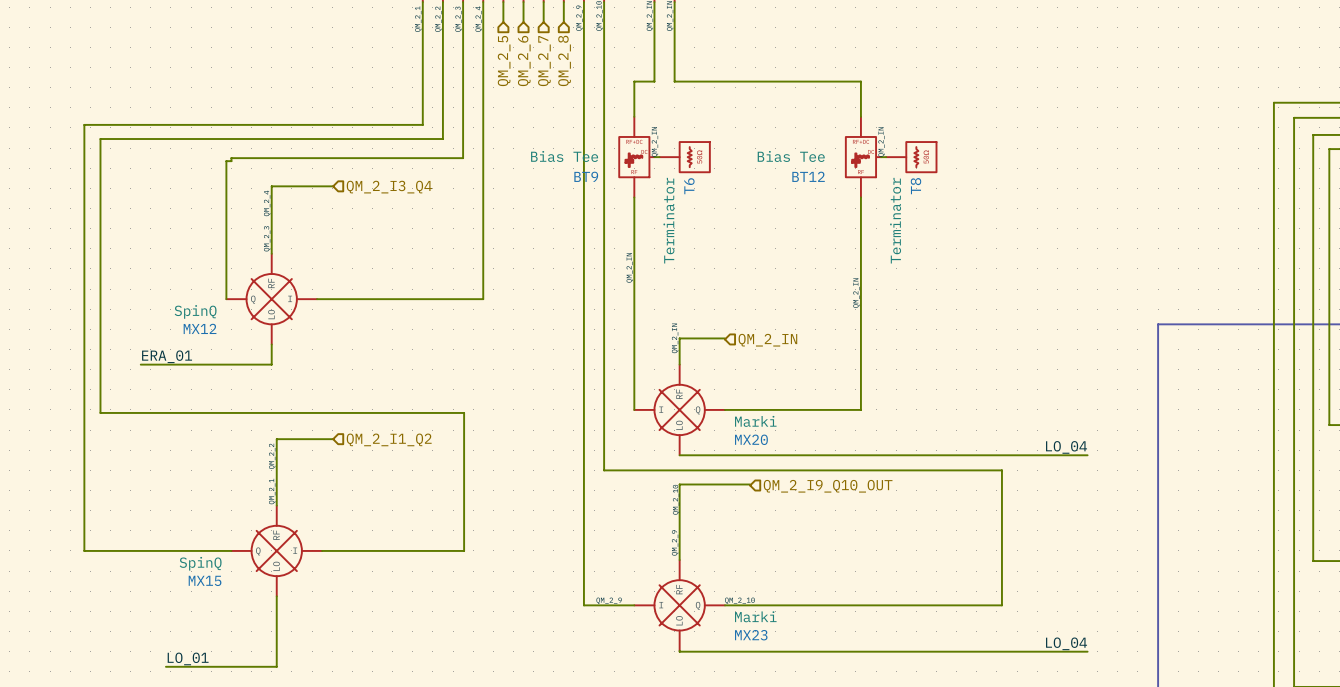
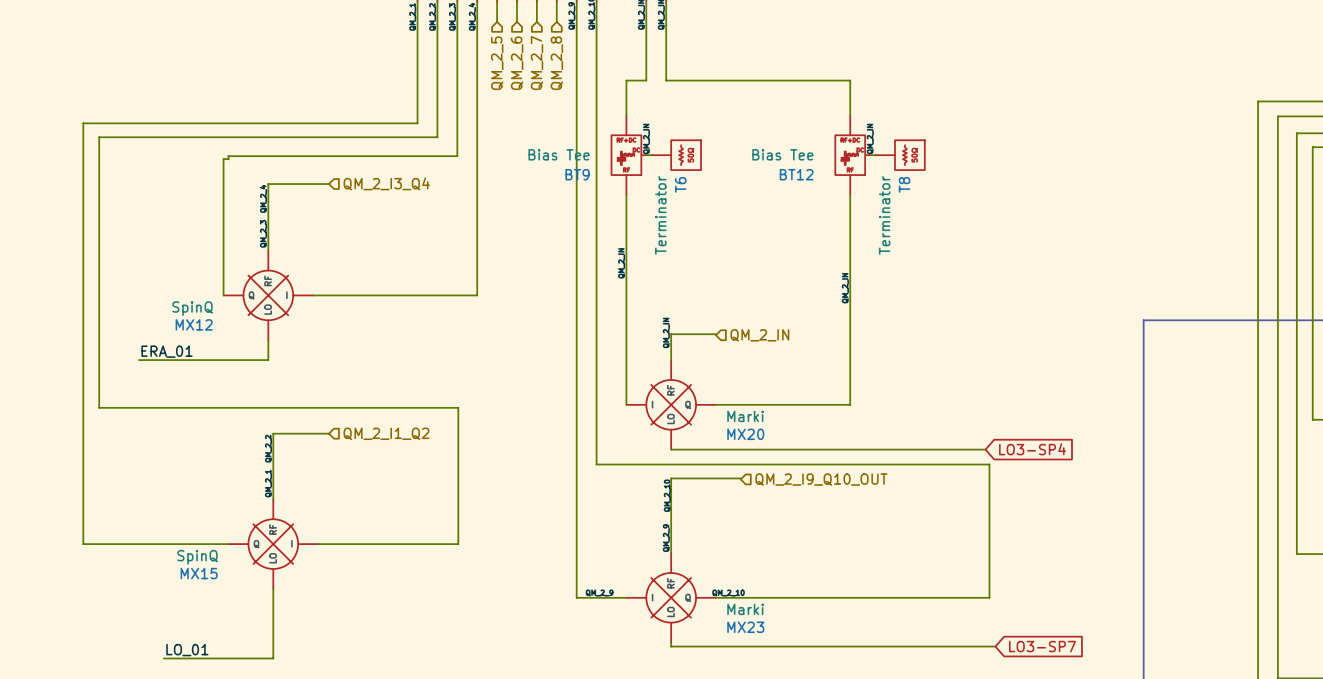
label: LO_04 (1066, 447) -> none
wire: (997, 455) (1087, 455) -> none
global label: none -> LO3-SP4 (1032, 449)
label: LO_04 (1066, 643) -> none
wire: (679, 651) (1087, 651) -> (671, 643) (671, 646) (995, 646)
global label: none -> LO3-SP7 (1042, 646)

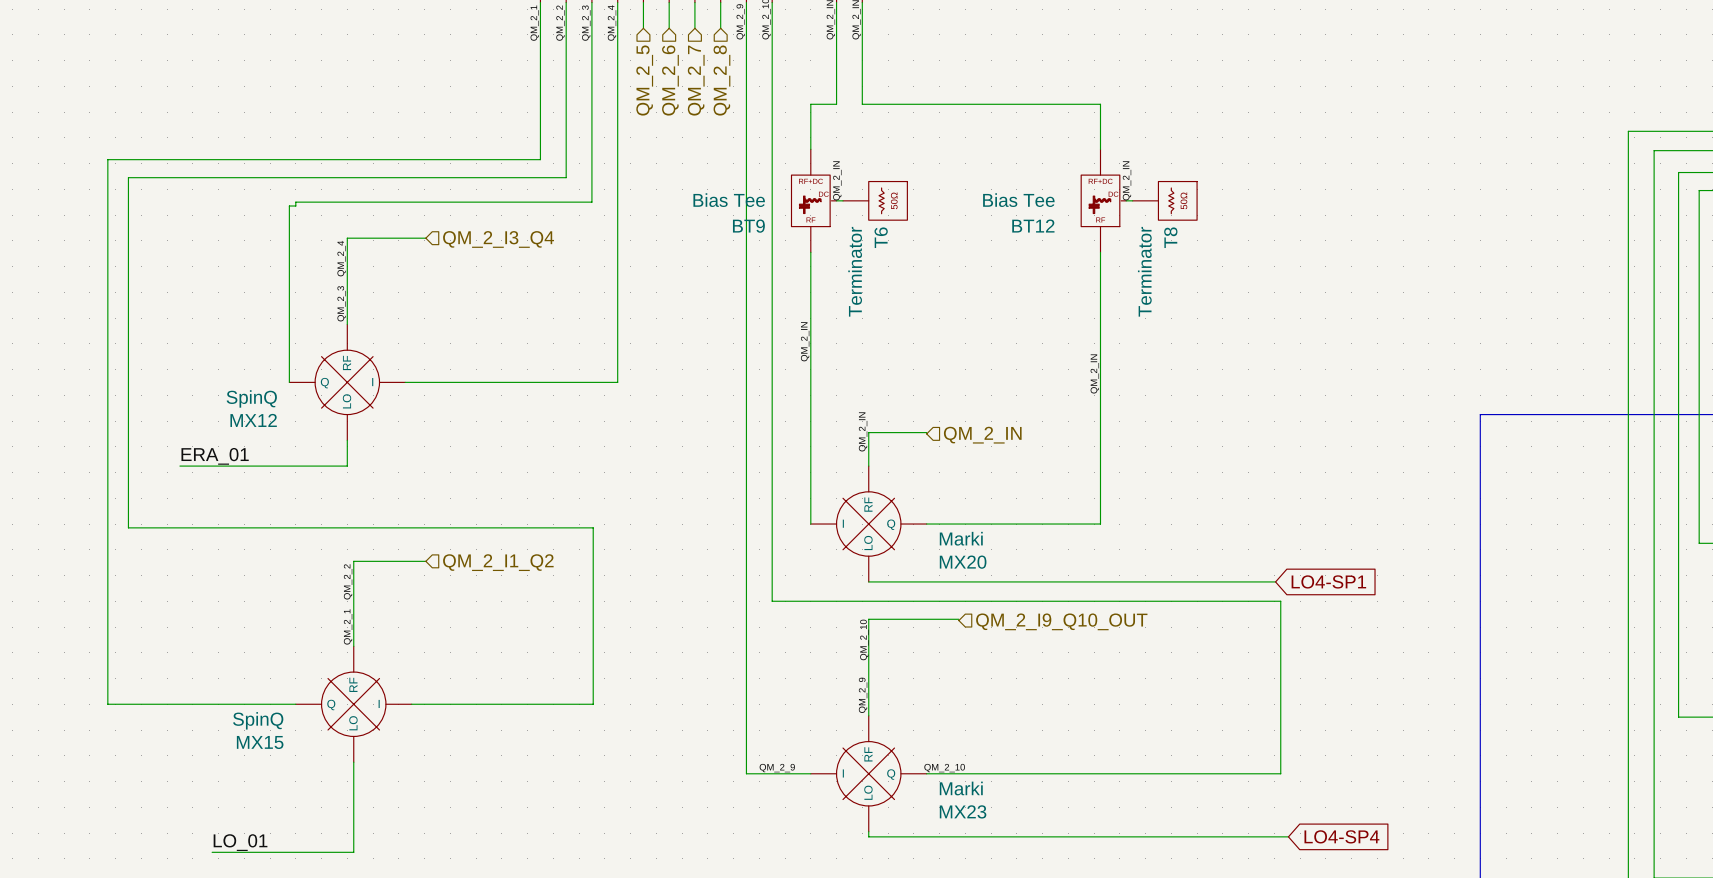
global label: LO3-SP4 (1032, 449) -> LO4-SP1 (1328, 581)
global label: LO3-SP7 (1042, 646) -> LO4-SP4 (1341, 836)

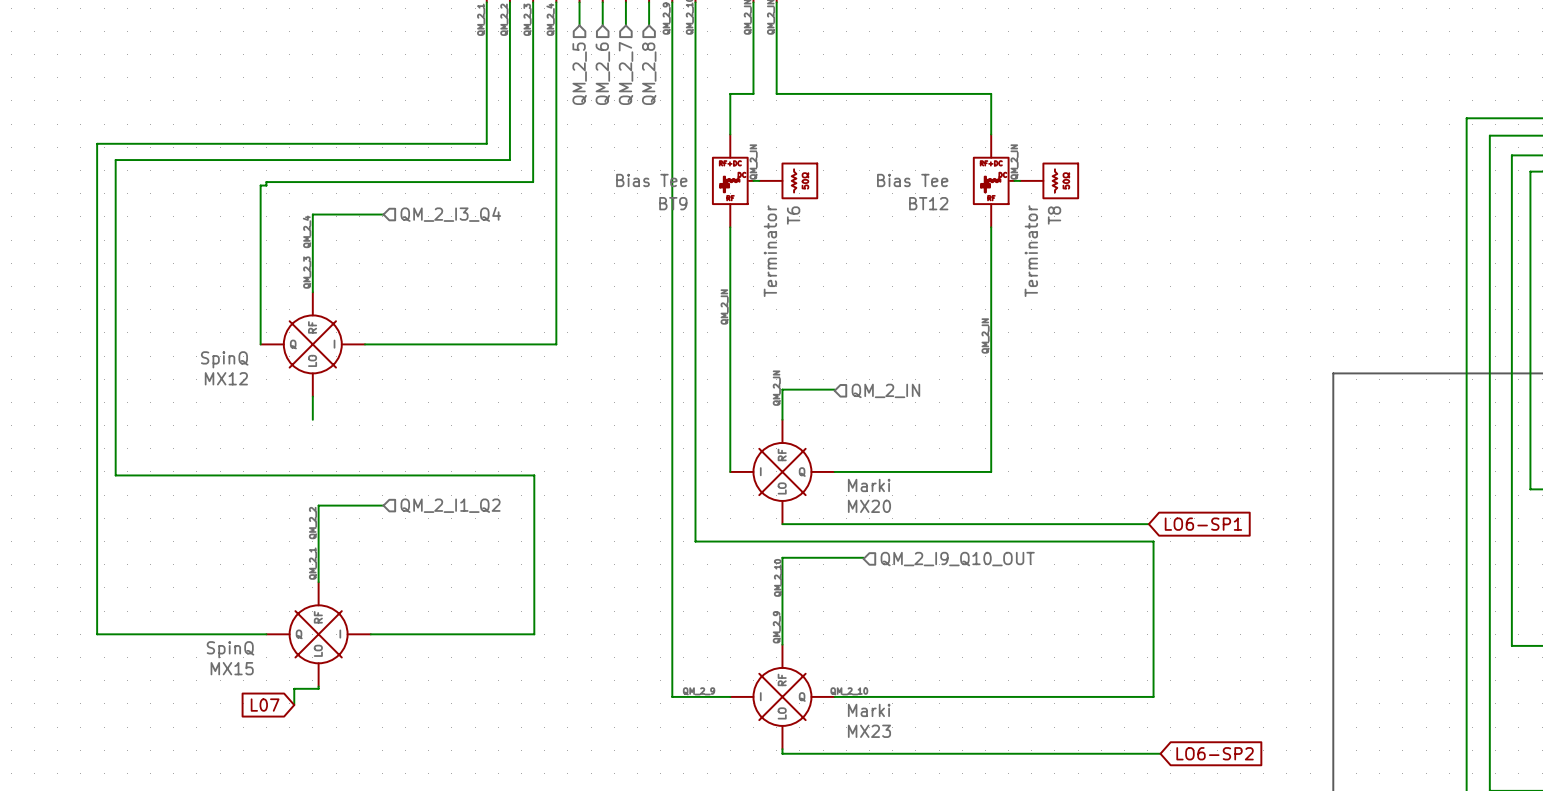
label: ERA_01 (215, 456) -> none
wire: (179, 466) (347, 466) -> none
global label: LO4-SP1 (1328, 581) -> LO6-SP1 (1203, 524)
wire: (353, 764) (353, 852) (212, 852) -> (318, 688) (294, 688) (294, 705)
global label: none -> L07 (265, 705)
global label: LO4-SP4 (1341, 836) -> LO6-SP2 (1215, 753)
label: LO_01 (240, 842) -> none

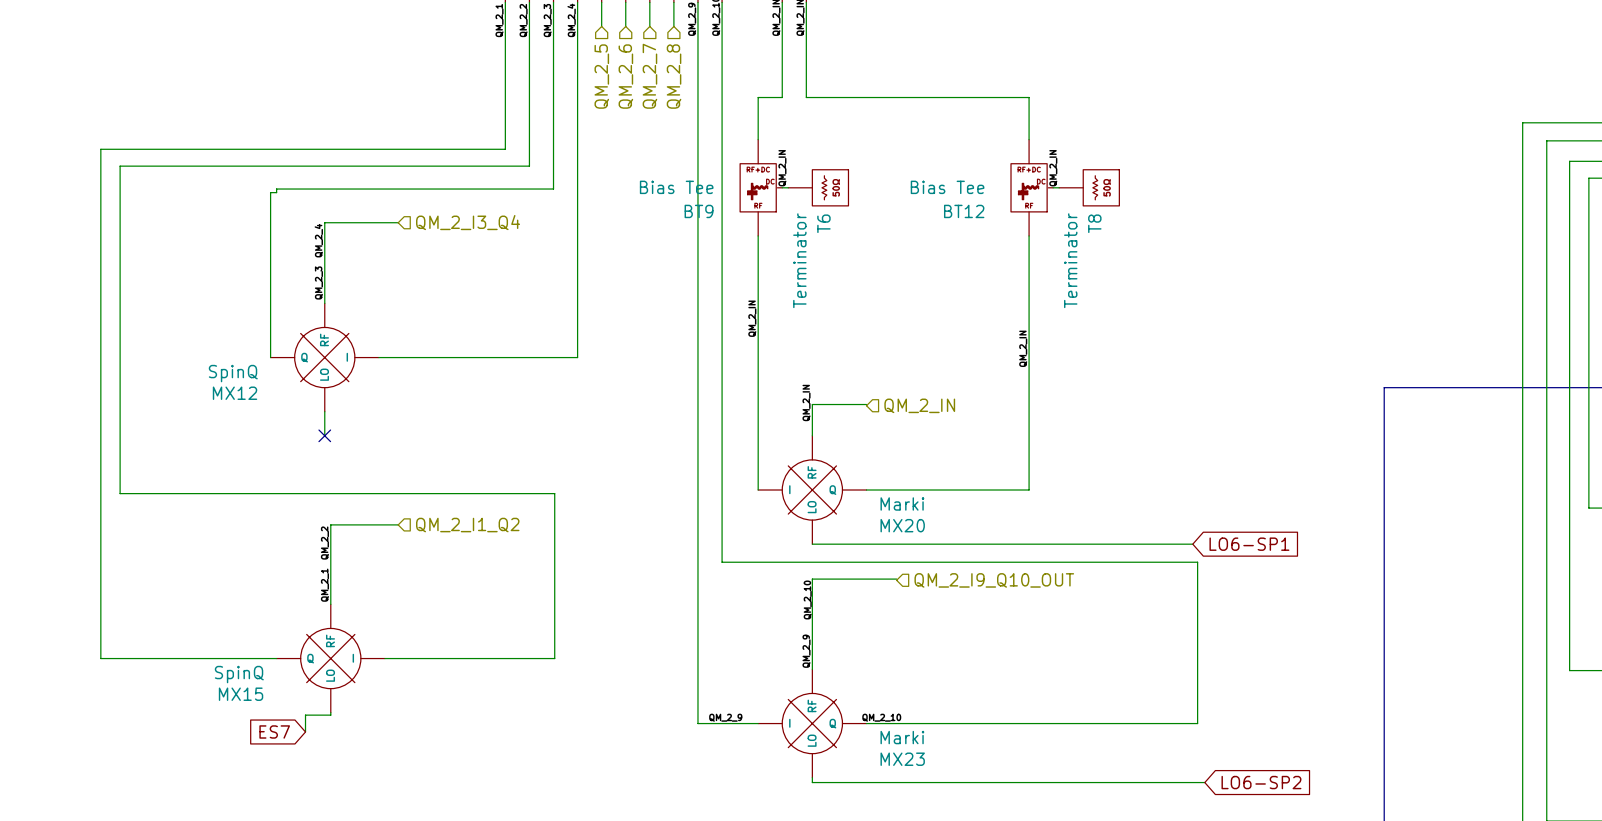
no-connect mark: none -> (324, 435)
global label: L07 (265, 705) -> ES7 (274, 731)

